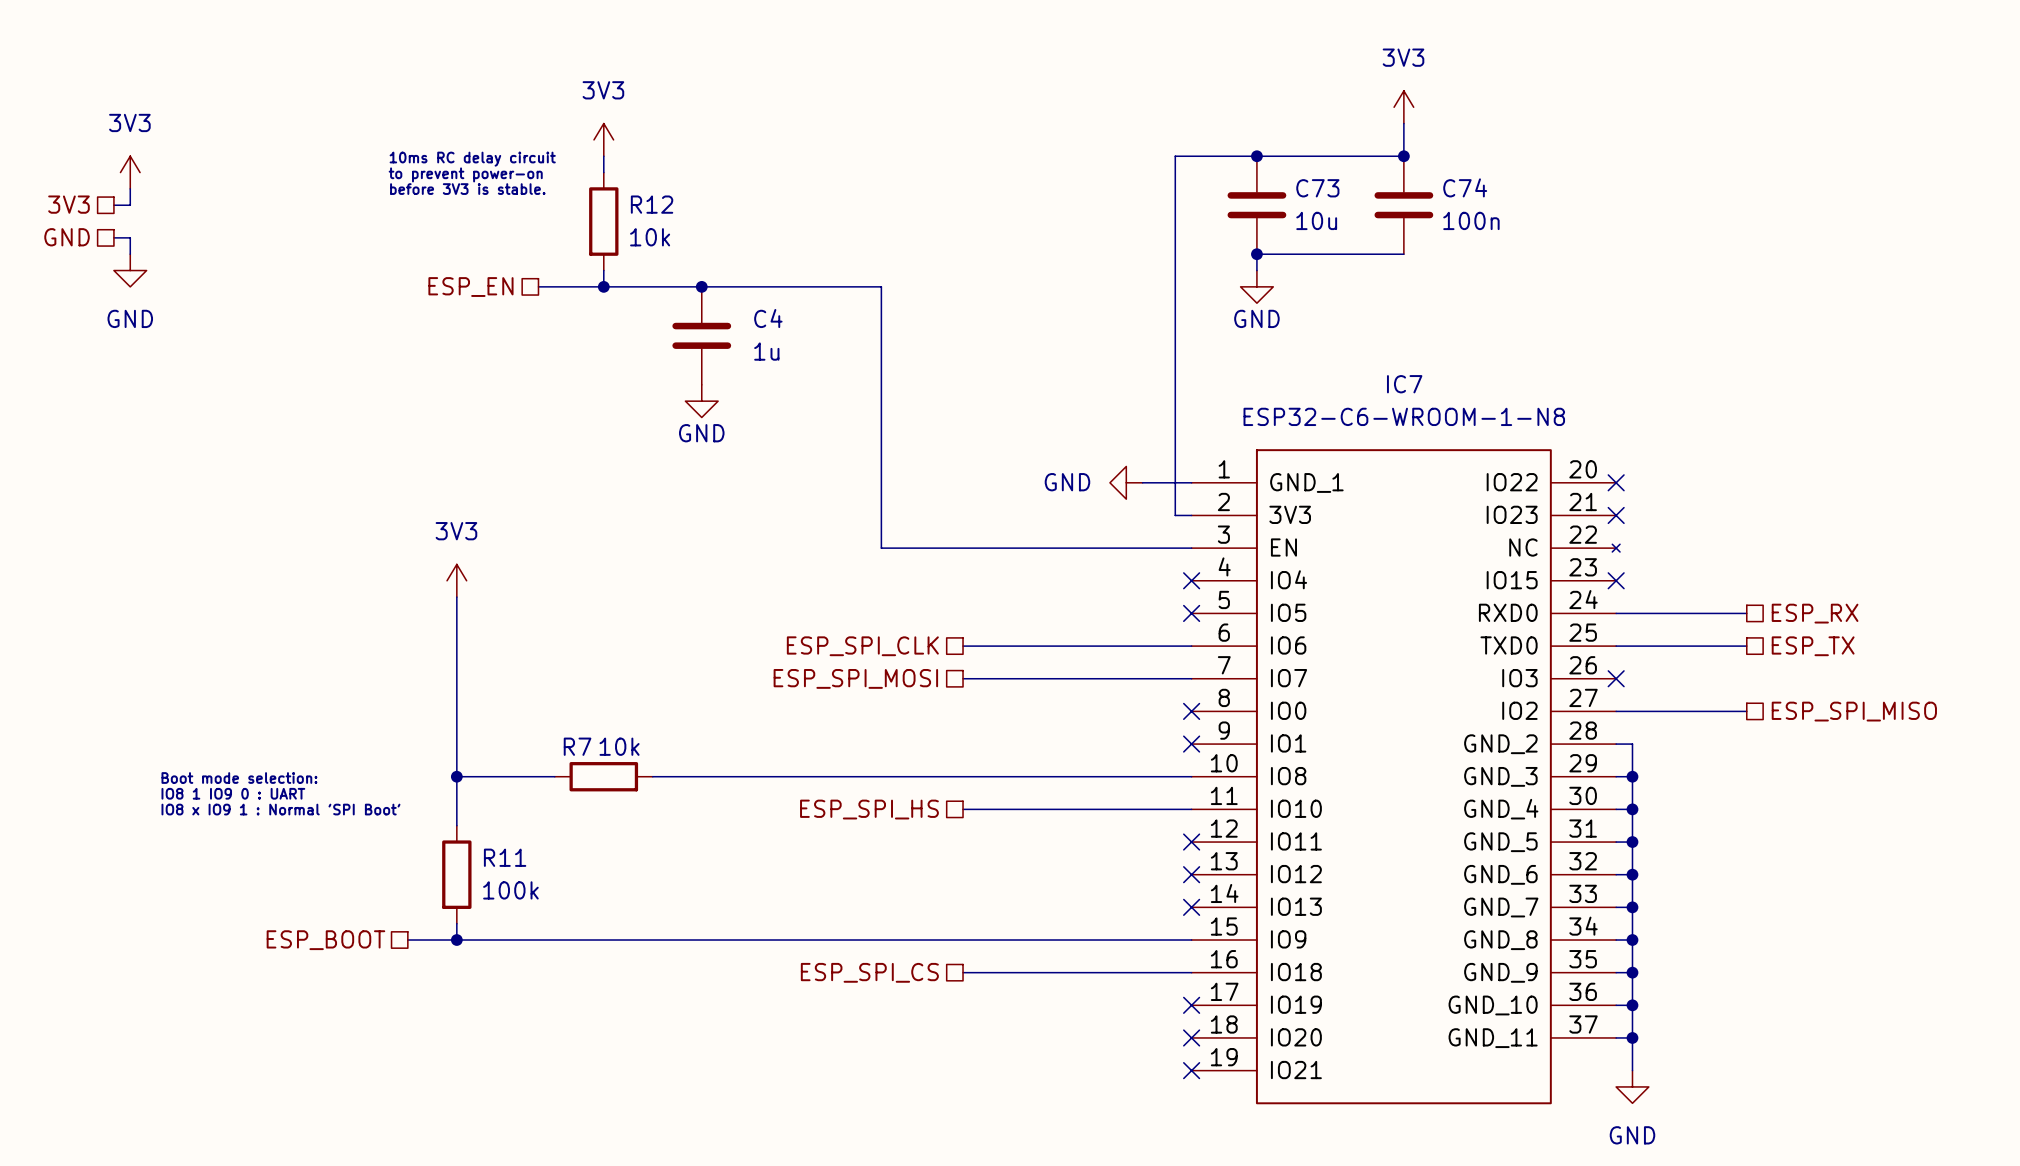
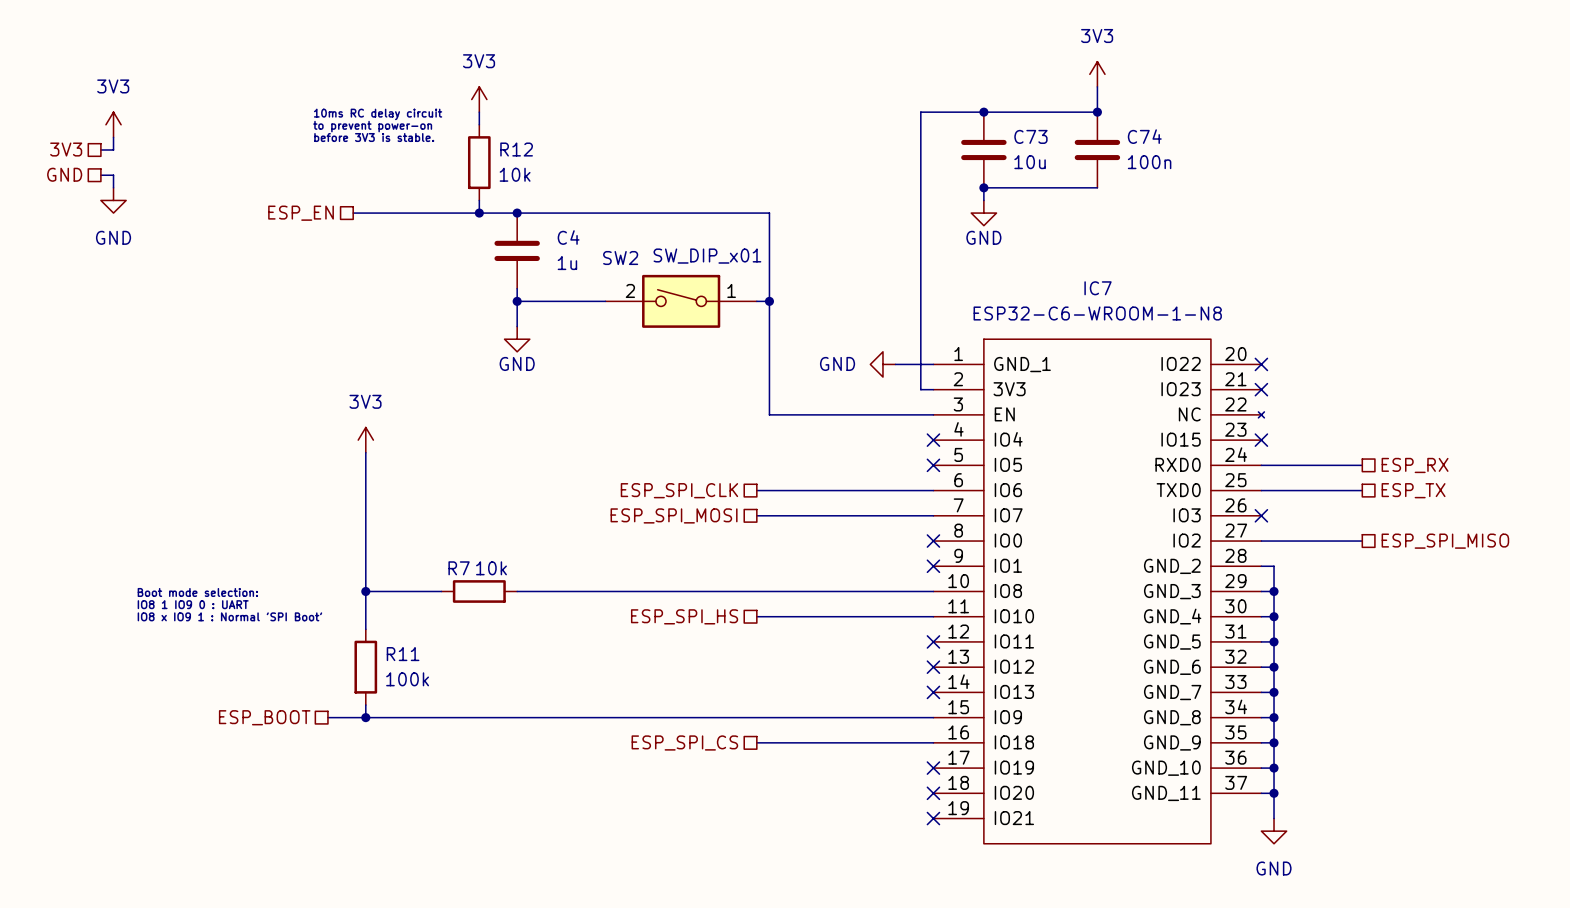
wire: none -> (353, 213) (428, 213)
junction position: (701, 286) -> (517, 213)
wire: (881, 286) (881, 548) (979, 548) -> (693, 213) (769, 213) (769, 414)
hierarchical label position: ESP_EN (470, 287) -> ESP_EN (301, 213)
C4 position: (701, 335) -> (517, 250)
wire: none -> (517, 288) (517, 326)
wire: none -> (517, 301) (605, 301)
junction: none -> (517, 301)
power symbol position: GND (701, 401) -> GND (517, 339)
SW2: none -> SW_DIP_x01 (681, 301)
wire: none -> (756, 301) (769, 301)
junction: none -> (769, 301)

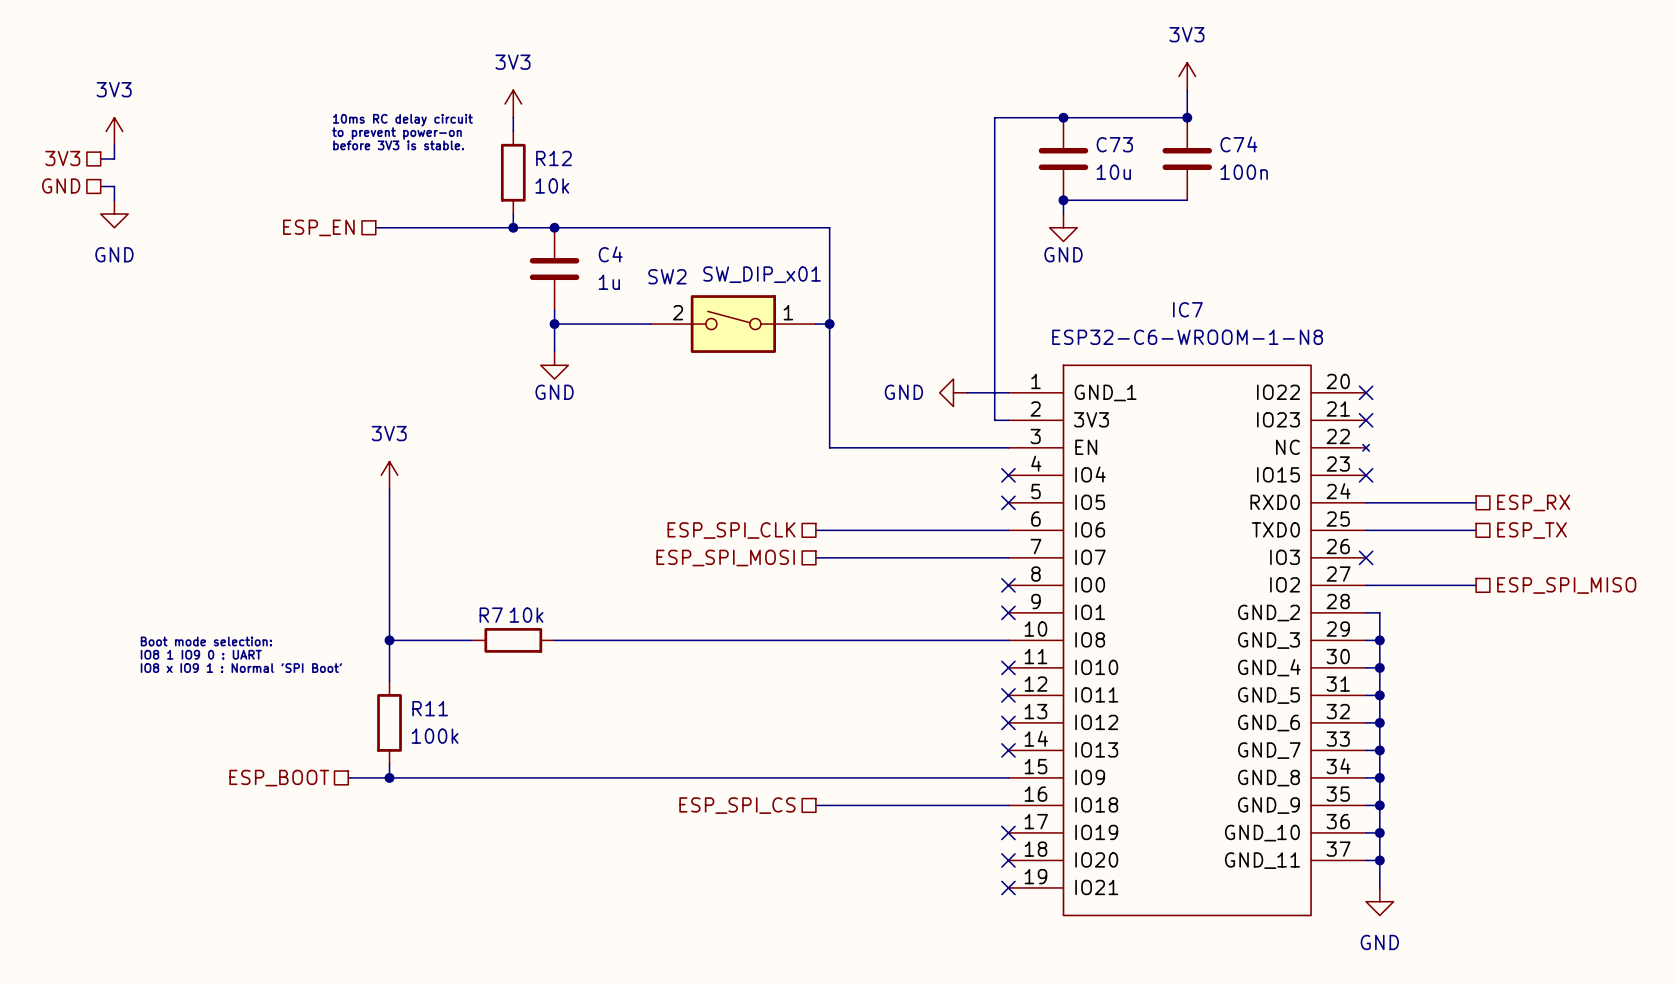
hierarchical label: ESP_SPI_HS (684, 616) -> none
wire: (756, 616) (933, 616) -> none
no-connect mark: none -> (1008, 667)

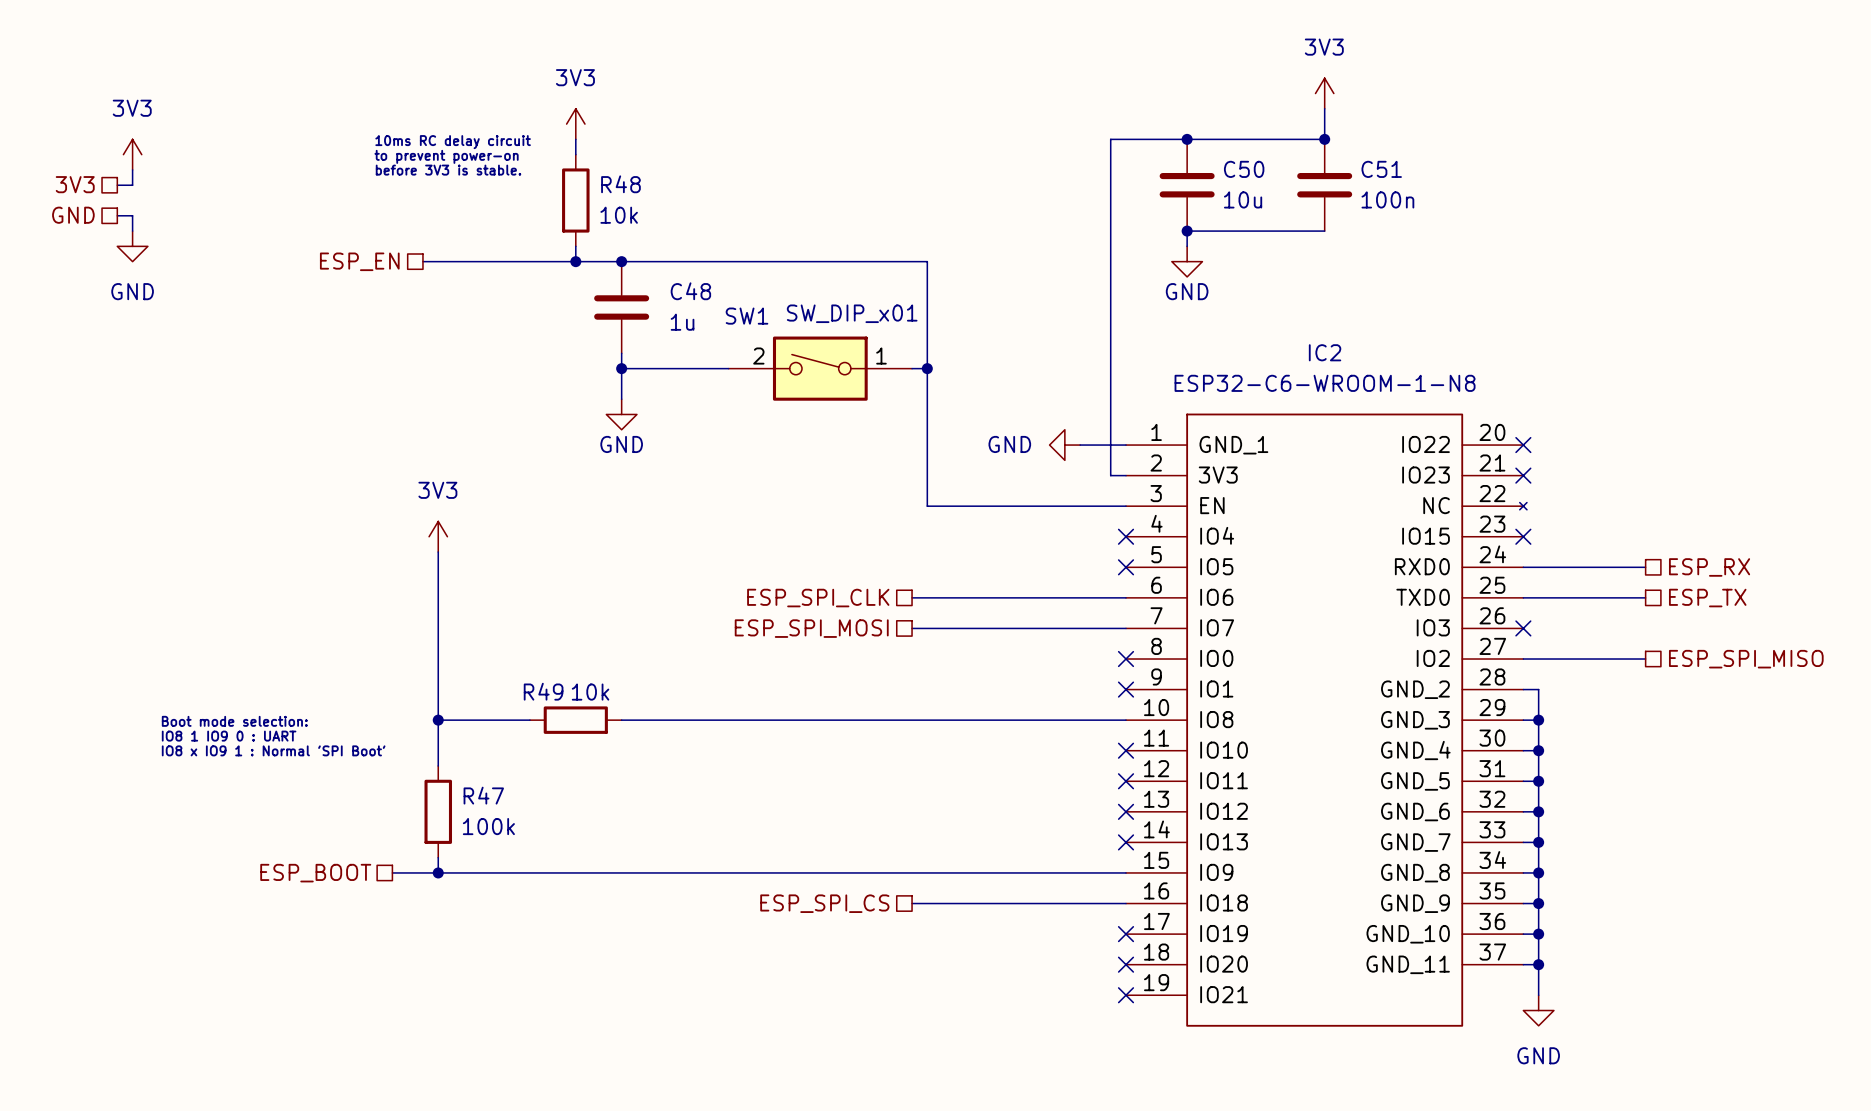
C73 name: C73 (1114, 144) -> C50 (1244, 169)
C74 name: C74 (1238, 144) -> C51 (1381, 169)
R12 name: R12 (553, 158) -> R48 (620, 184)
C4 name: C4 (610, 254) -> C48 (690, 291)
SW2 name: SW2 (667, 276) -> SW1 (747, 316)
IC7 name: IC7 (1187, 309) -> IC2 (1325, 352)
R7 name: R7 (491, 615) -> R49 (543, 691)
R11 name: R11 (430, 708) -> R47 (483, 795)

